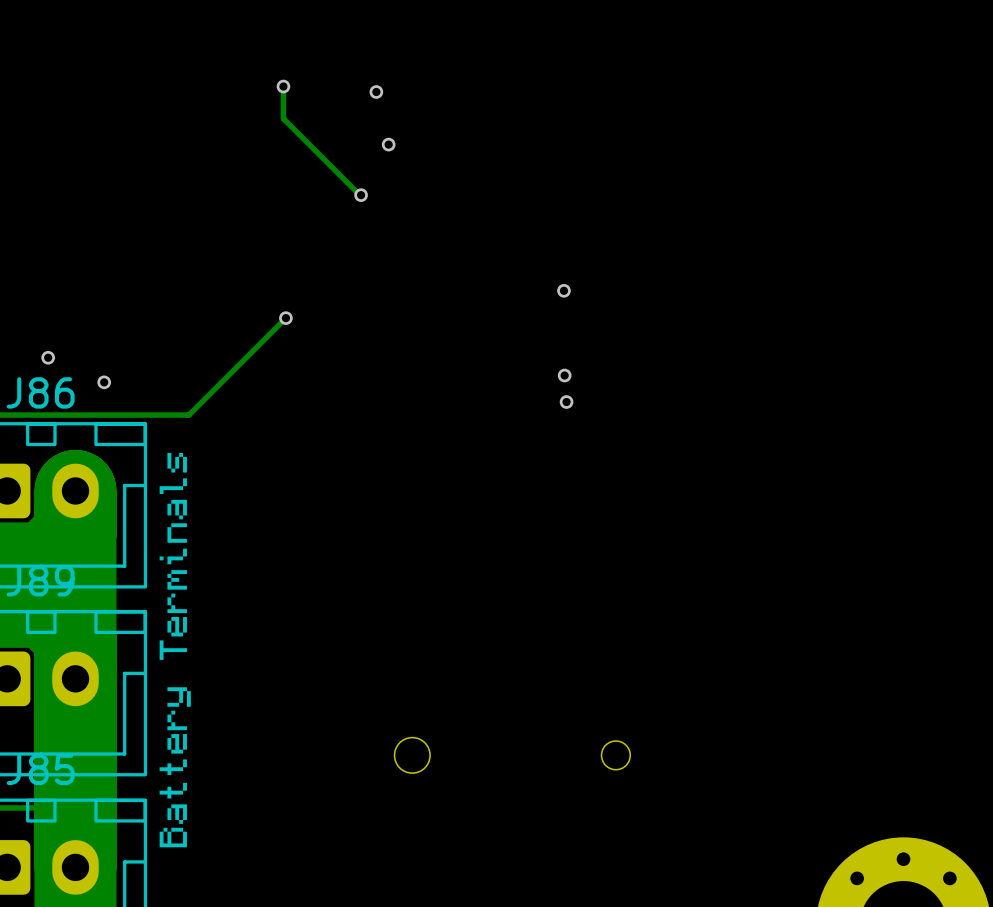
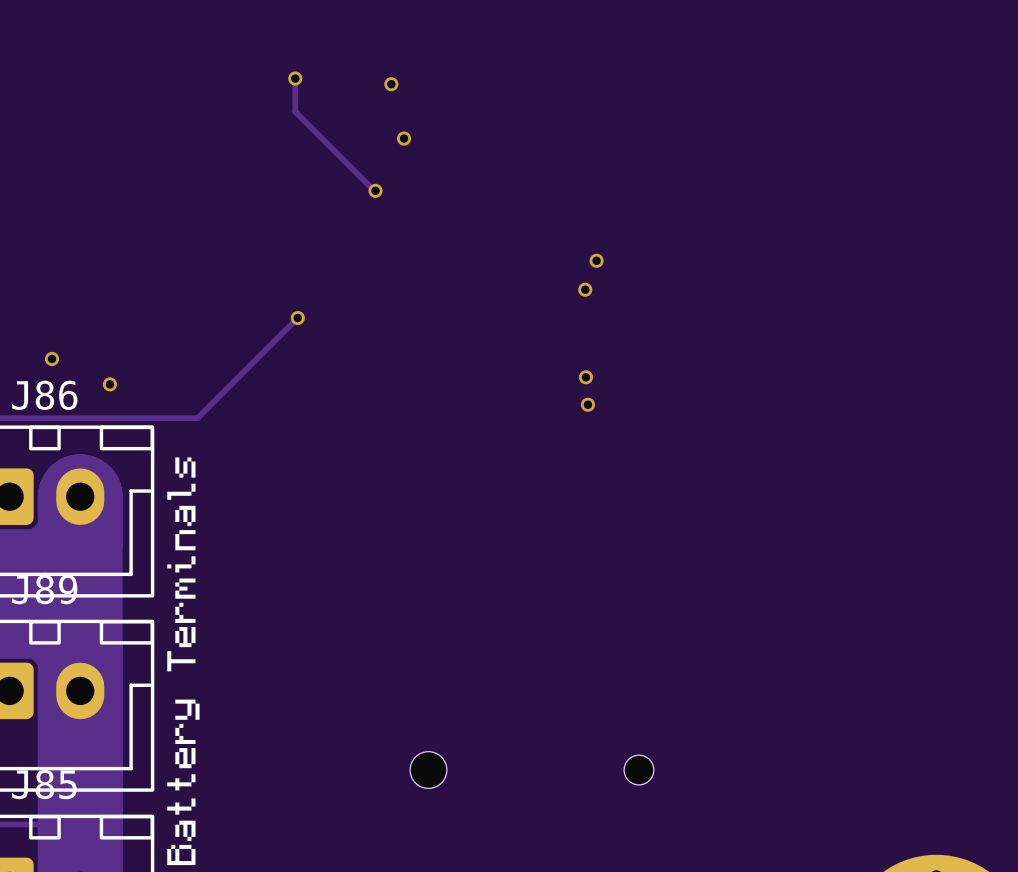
via: none -> (596, 260)

